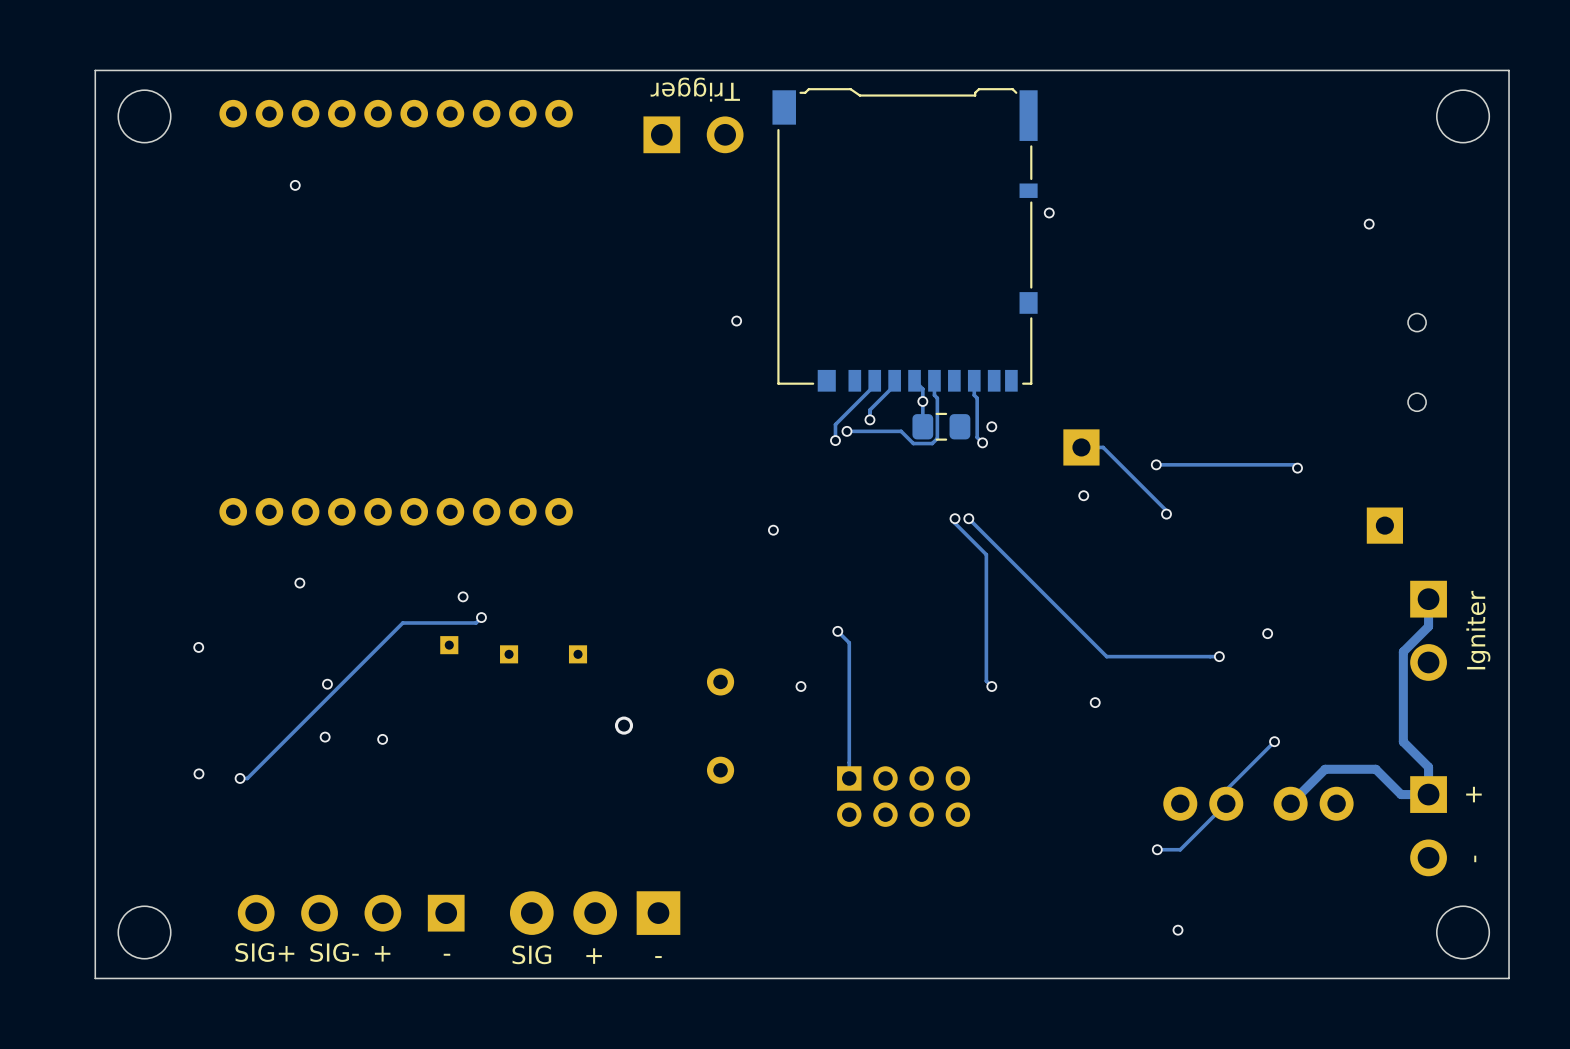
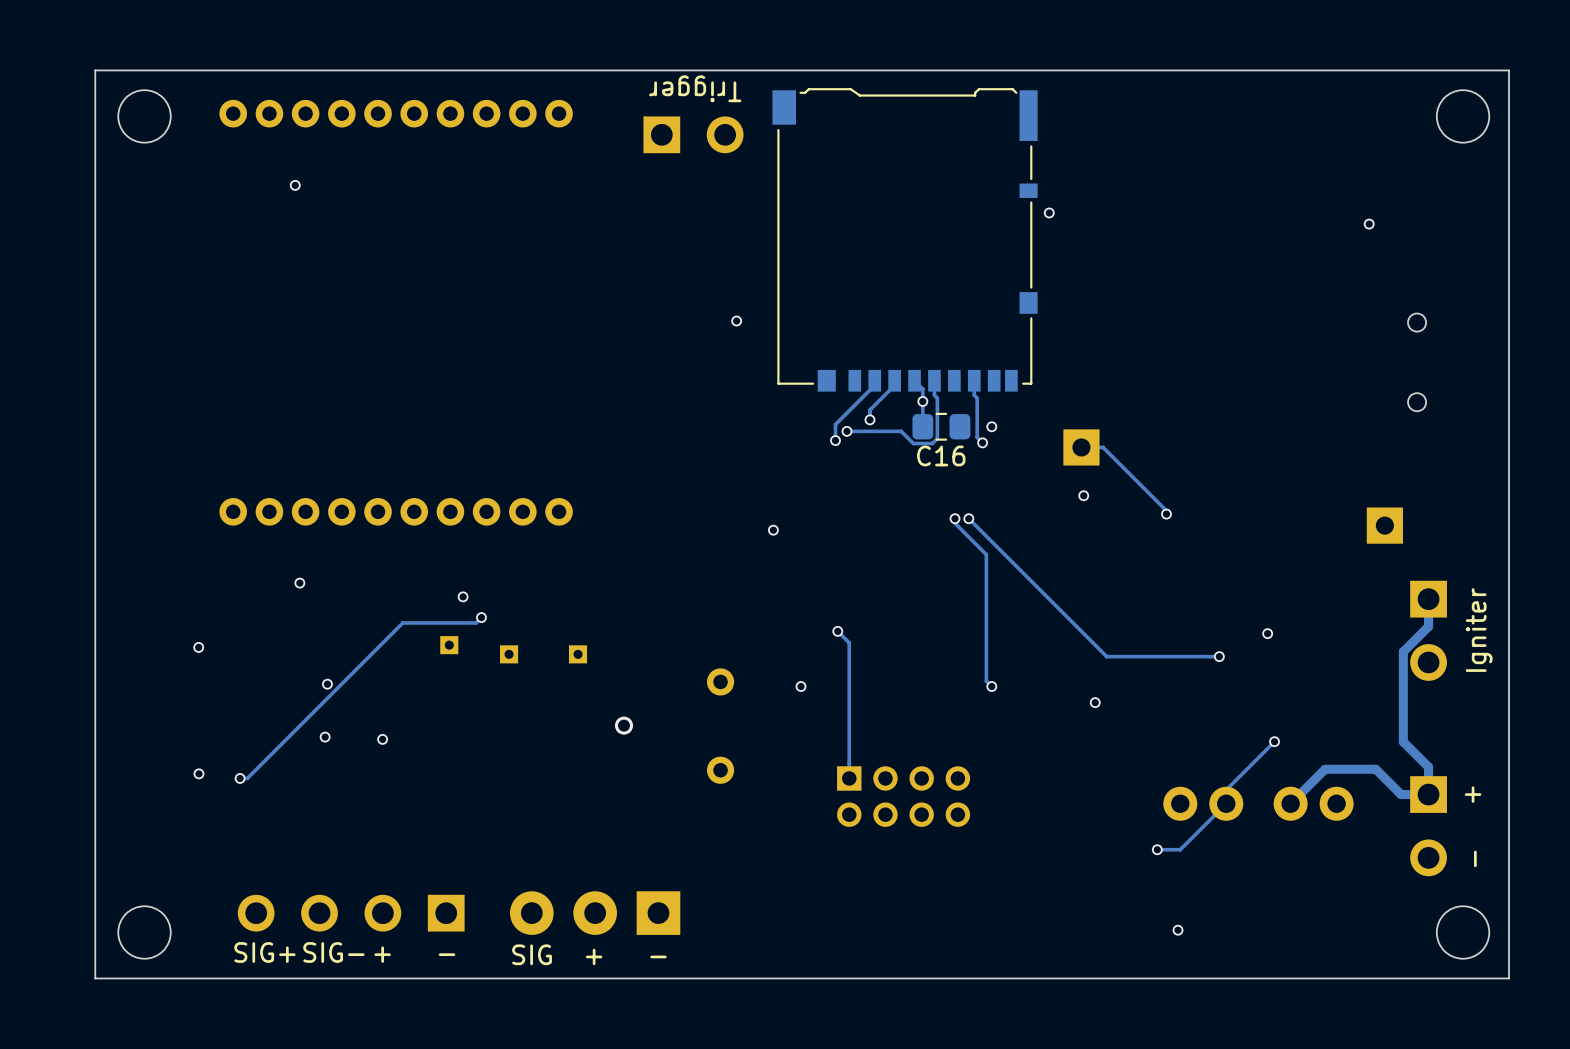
C16 name: none -> C16 (941, 455)
track: (1156, 464) (1294, 464) (1297, 468) -> none
via: (1156, 464) -> none
via: (1297, 468) -> none

